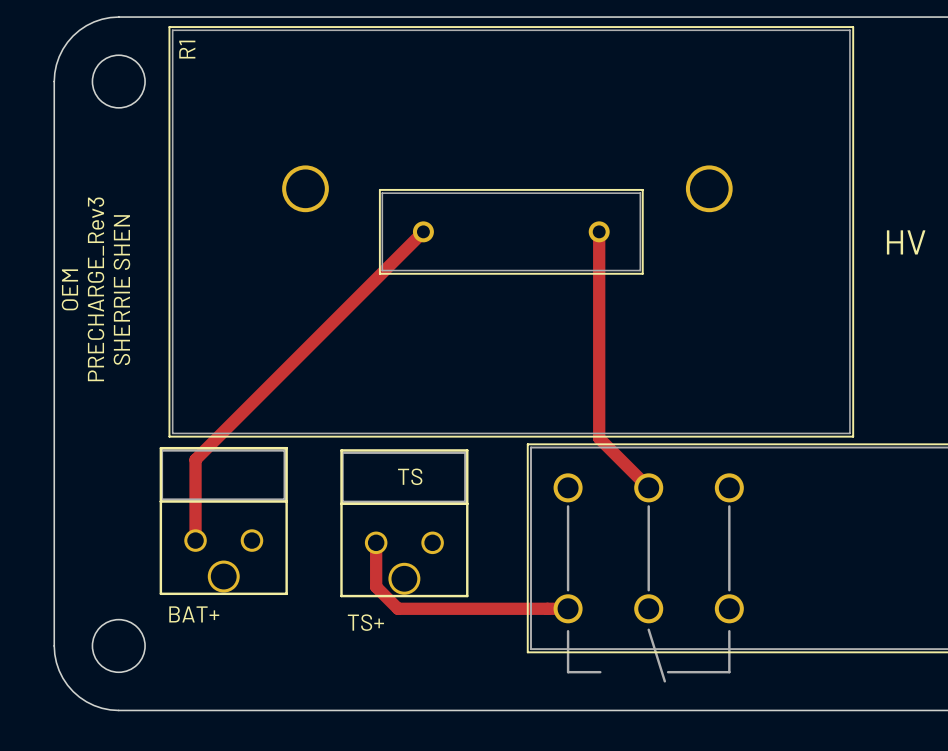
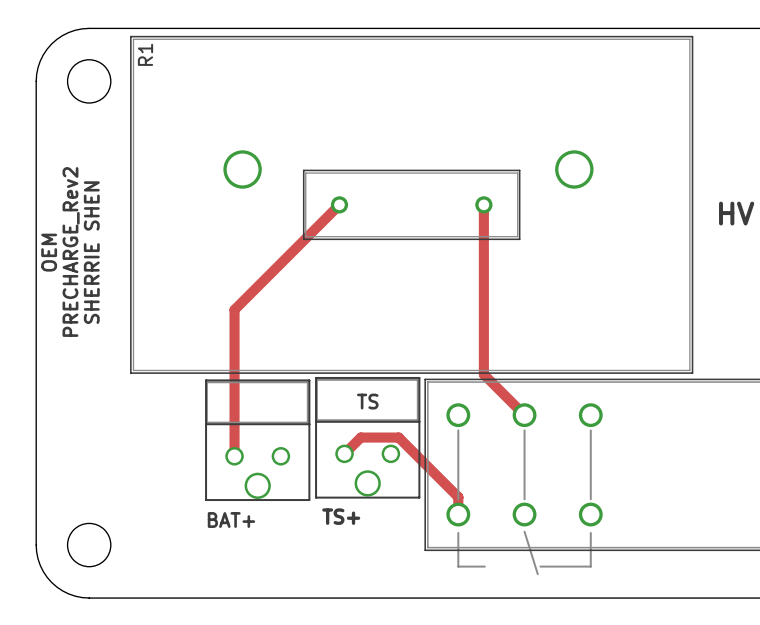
text: PRECHARGE_Rev3 (95, 289) -> PRECHARGE_Rev2 (71, 252)
top track: (295, 359) (195, 459) (195, 540) -> (234, 309) (234, 456)
text position: TS (410, 476) -> TS (367, 401)
part: none -> (367, 437)
part: none -> (257, 440)
part: (223, 520) -> none
part: (404, 523) -> none
top track: (376, 542) (376, 586) (398, 608) (568, 608) -> (344, 453) (360, 437) (398, 437) (458, 497) (458, 514)
text position: BAT+ (194, 614) -> BAT+ (231, 520)
text position: TS+ (365, 622) -> TS+ (341, 516)

